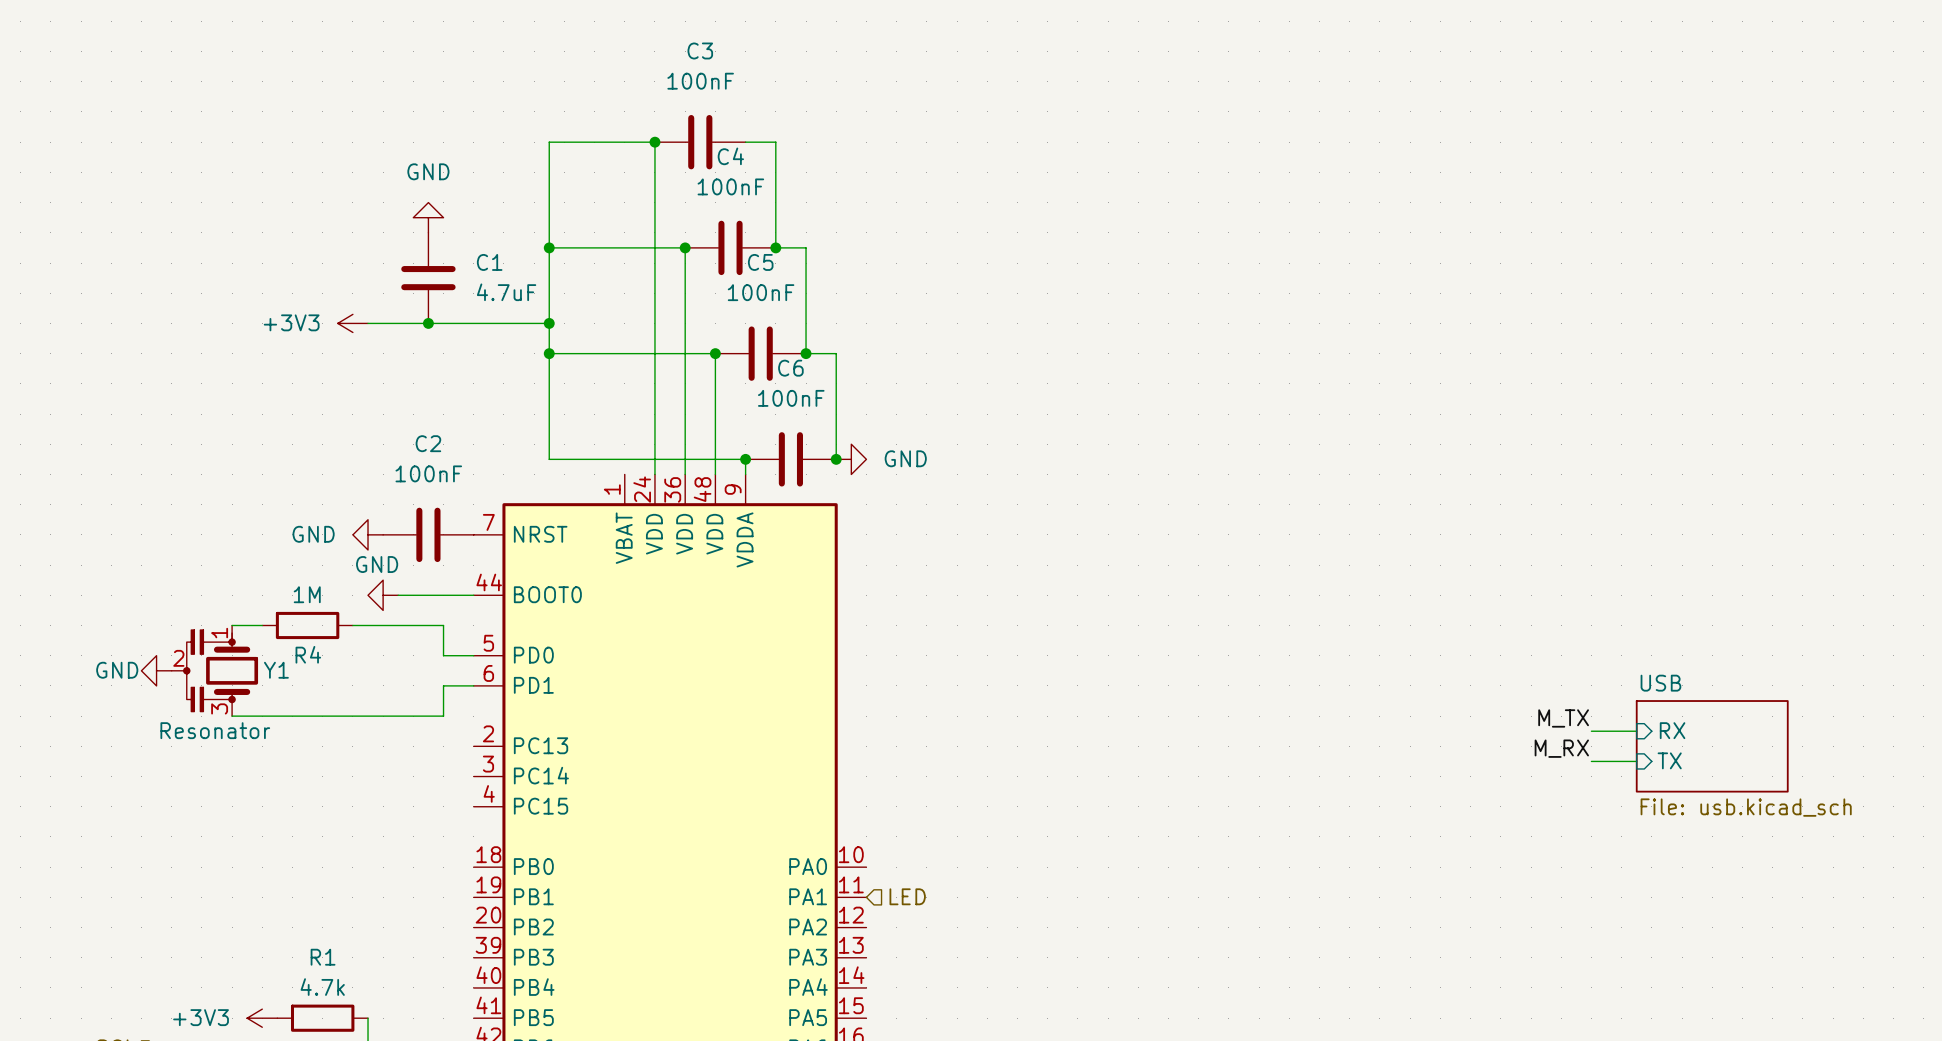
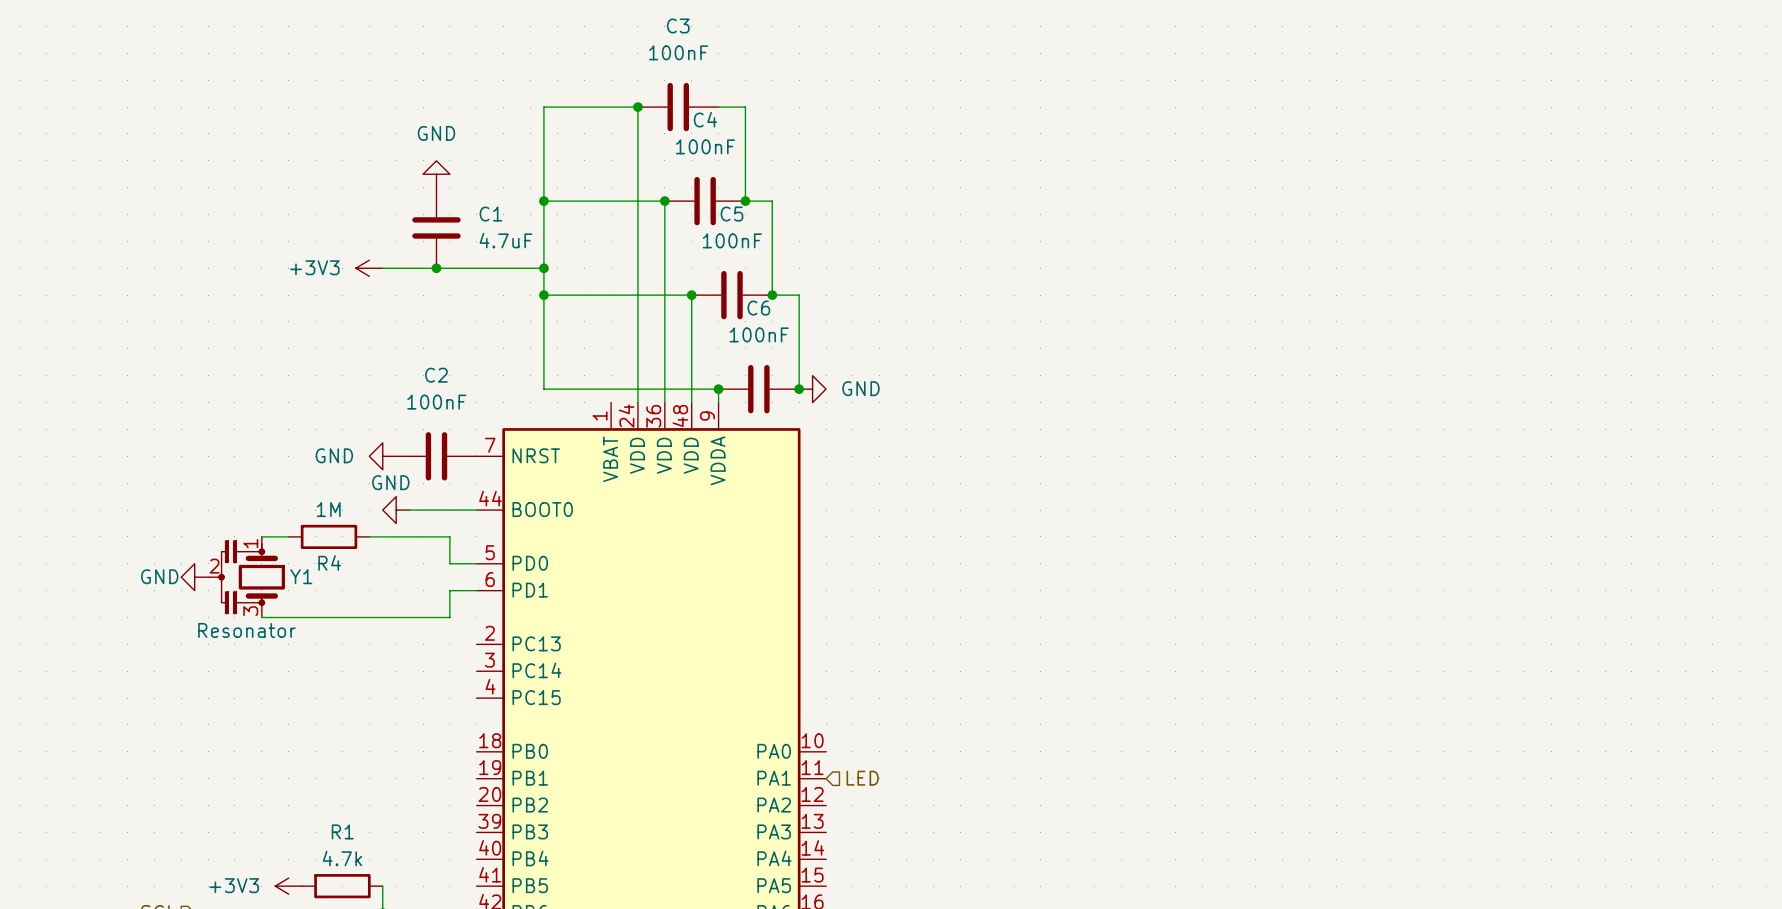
label: M_TX (1563, 718) -> none
sheet pin: RX (1672, 730) -> none
wire: (1591, 731) (1636, 731) -> none
sheet USB: File: usb.kicad_sch (1712, 746) -> none
label: M_RX (1561, 748) -> none
sheet pin: TX (1669, 760) -> none
wire: (1591, 761) (1636, 761) -> none

